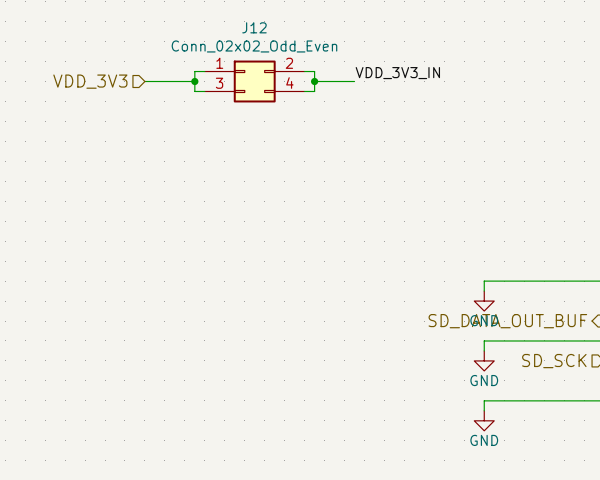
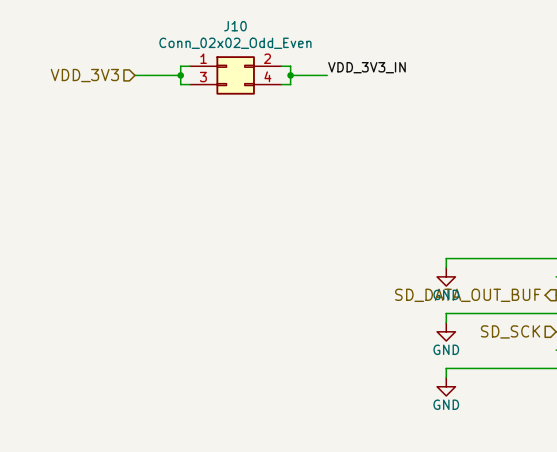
J12 name: J12 (254, 27) -> J10 (235, 26)

